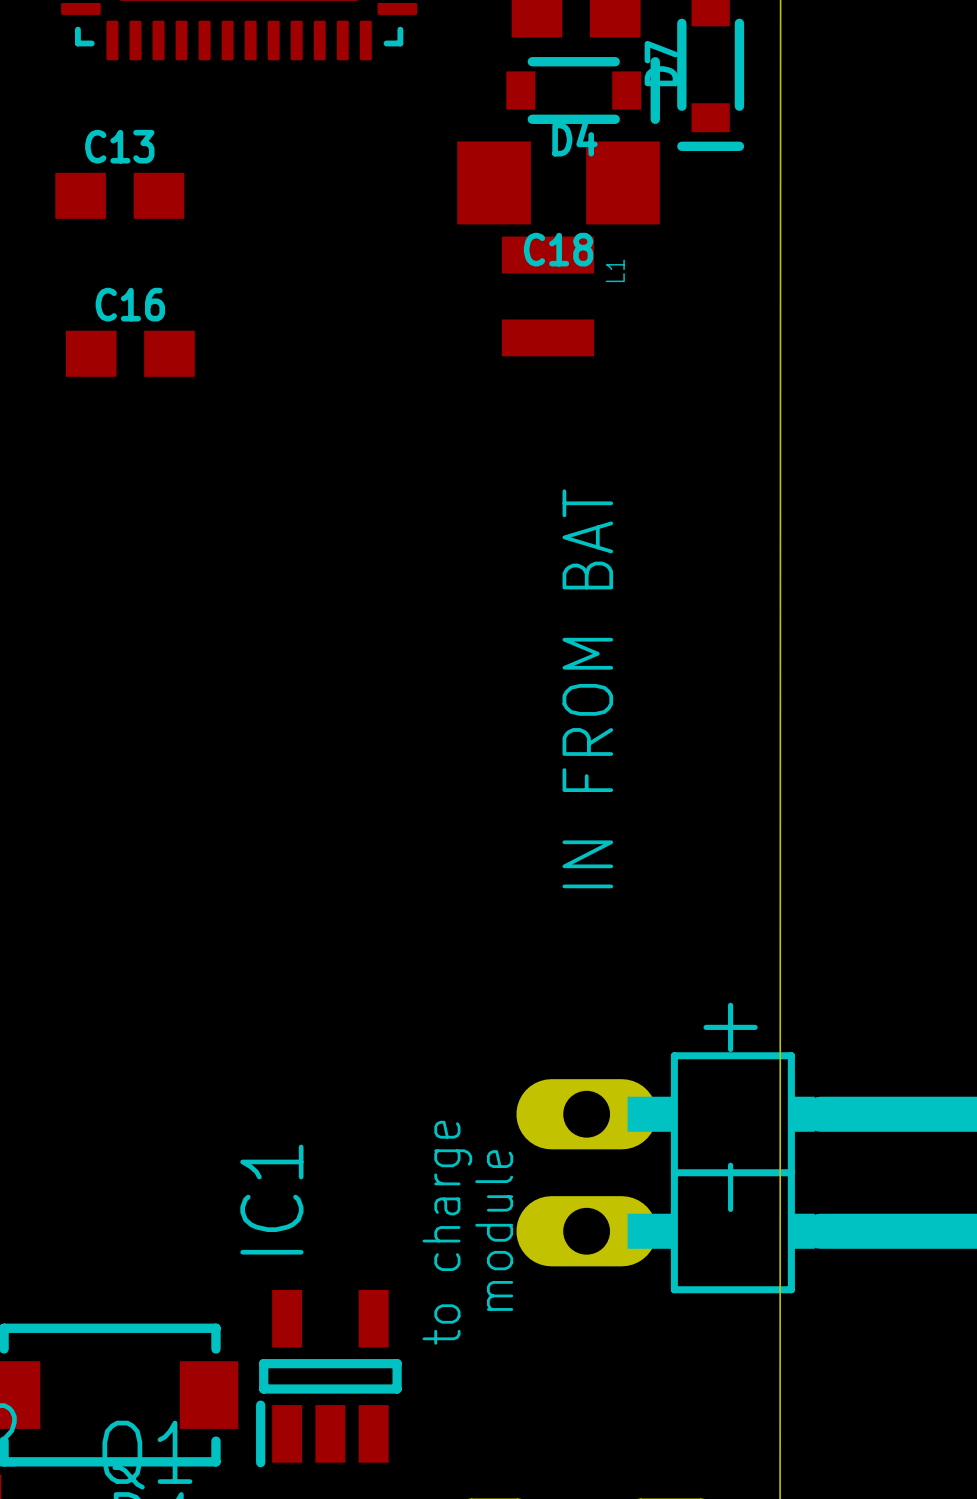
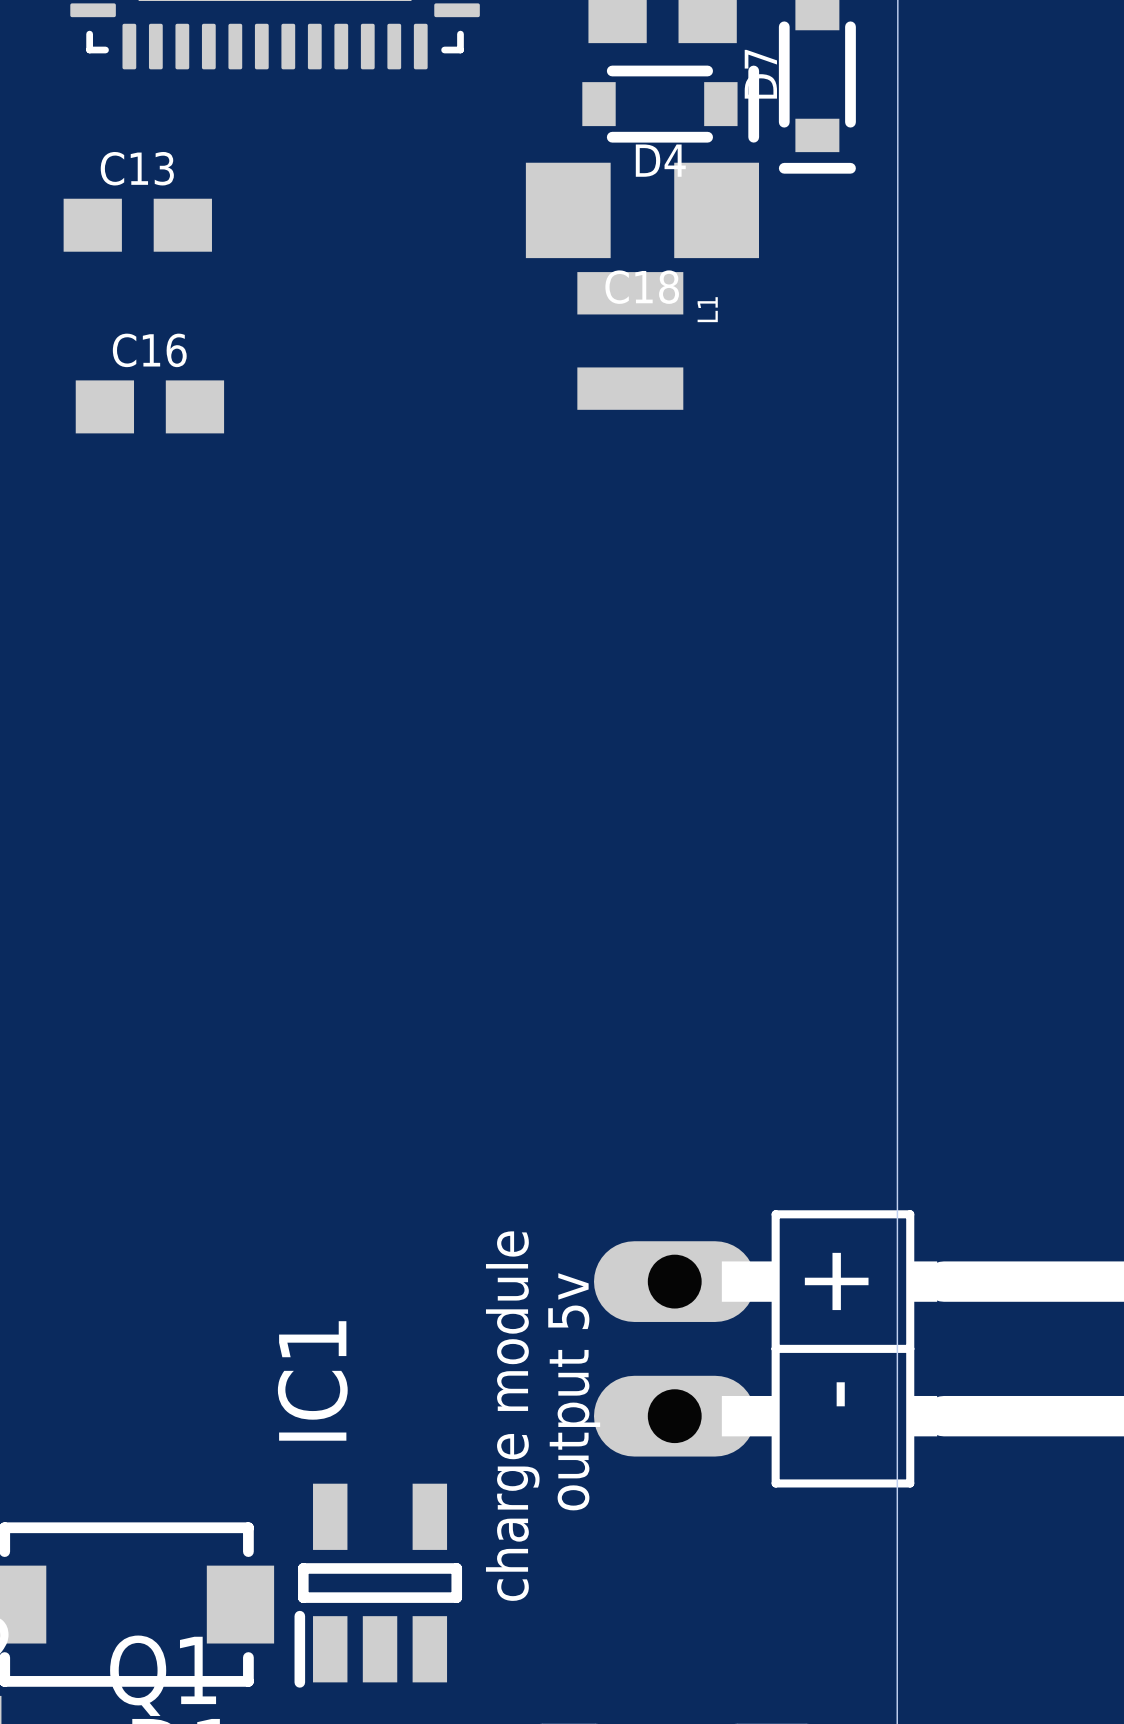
text: IN FROM BAT (587, 688) -> none
text: module (494, 1230) -> output 5v (574, 1391)
text: to charge (447, 1232) -> charge module (512, 1416)

